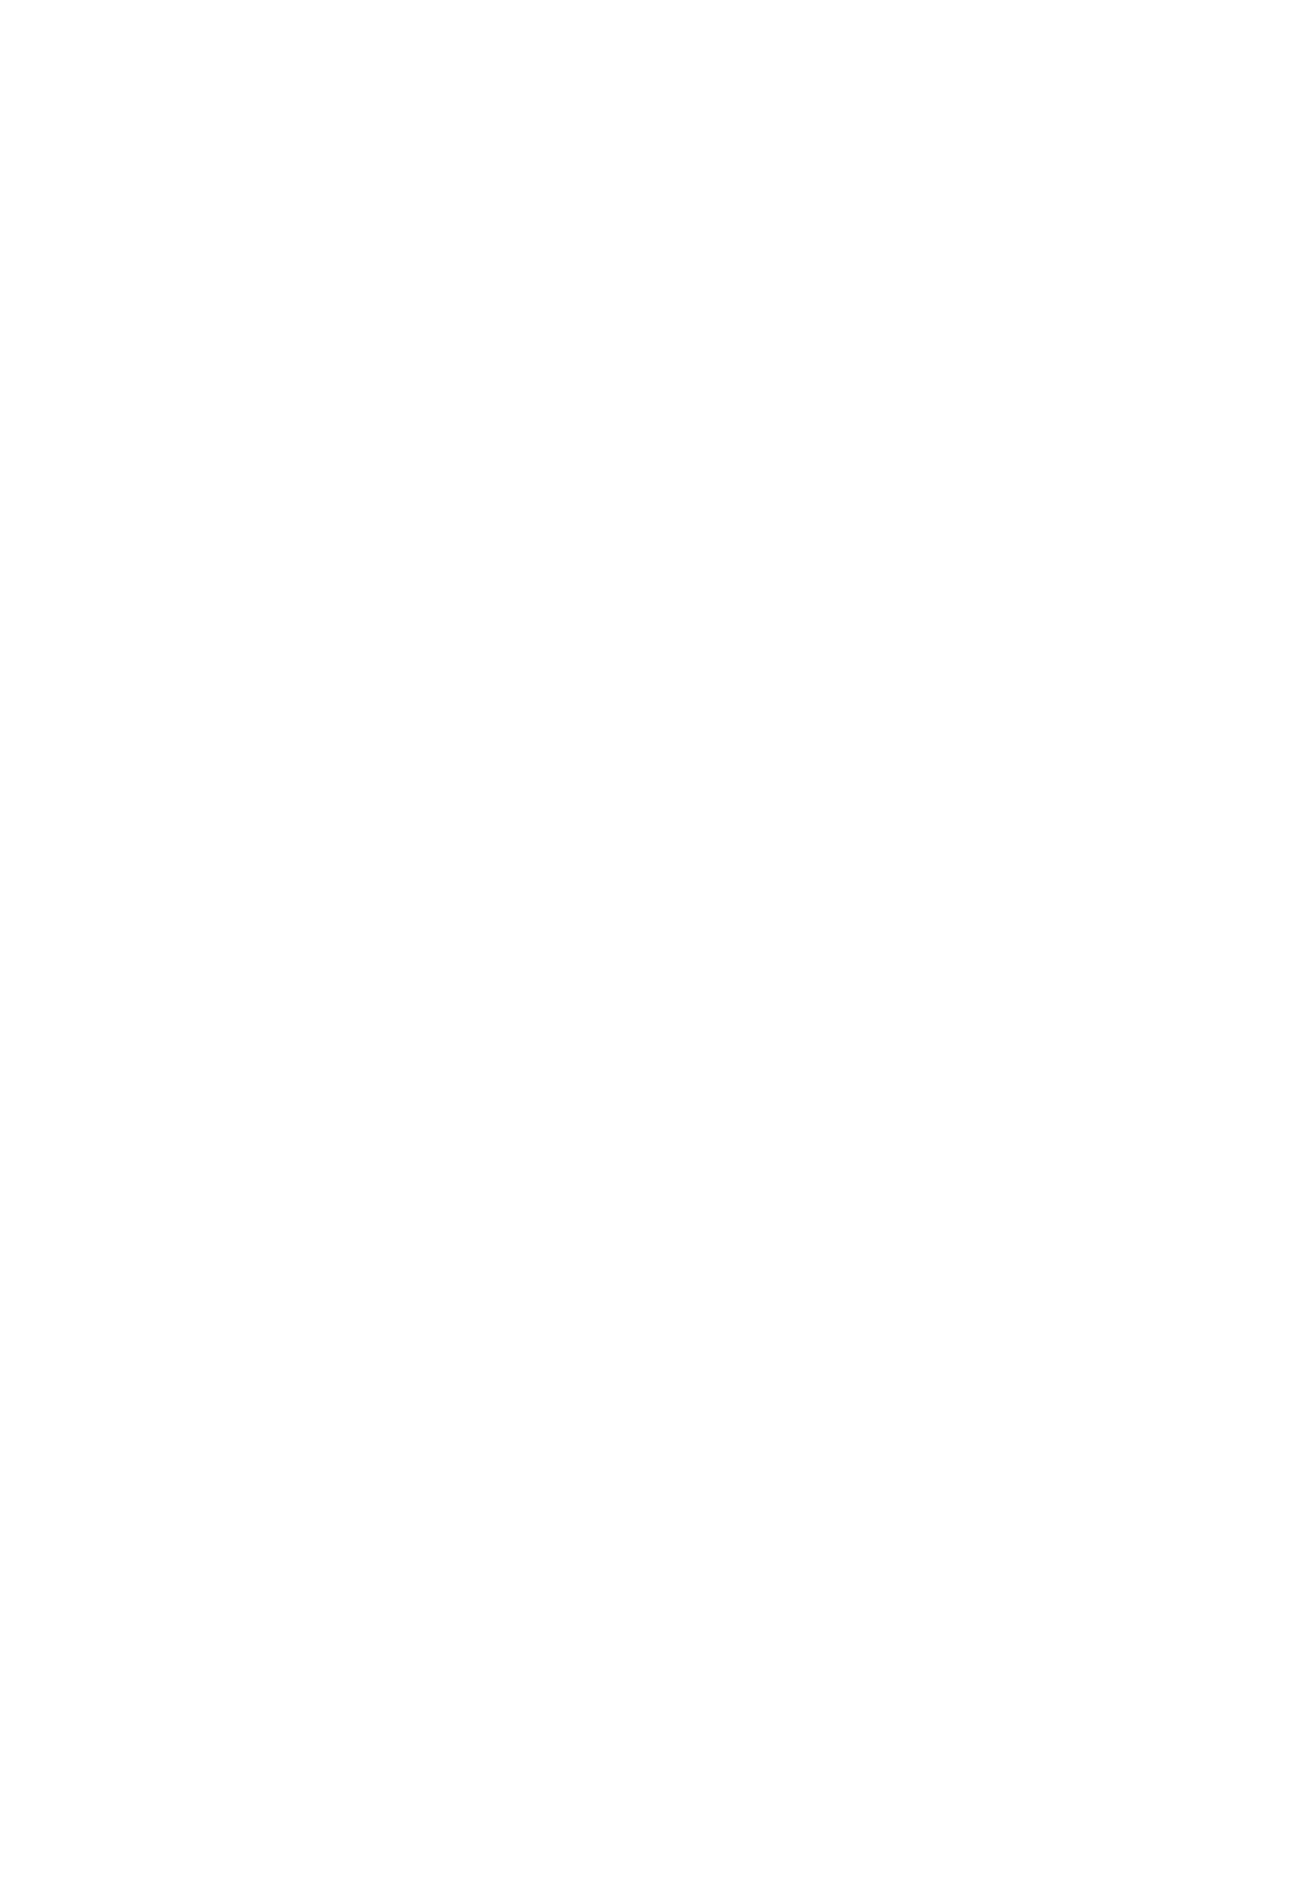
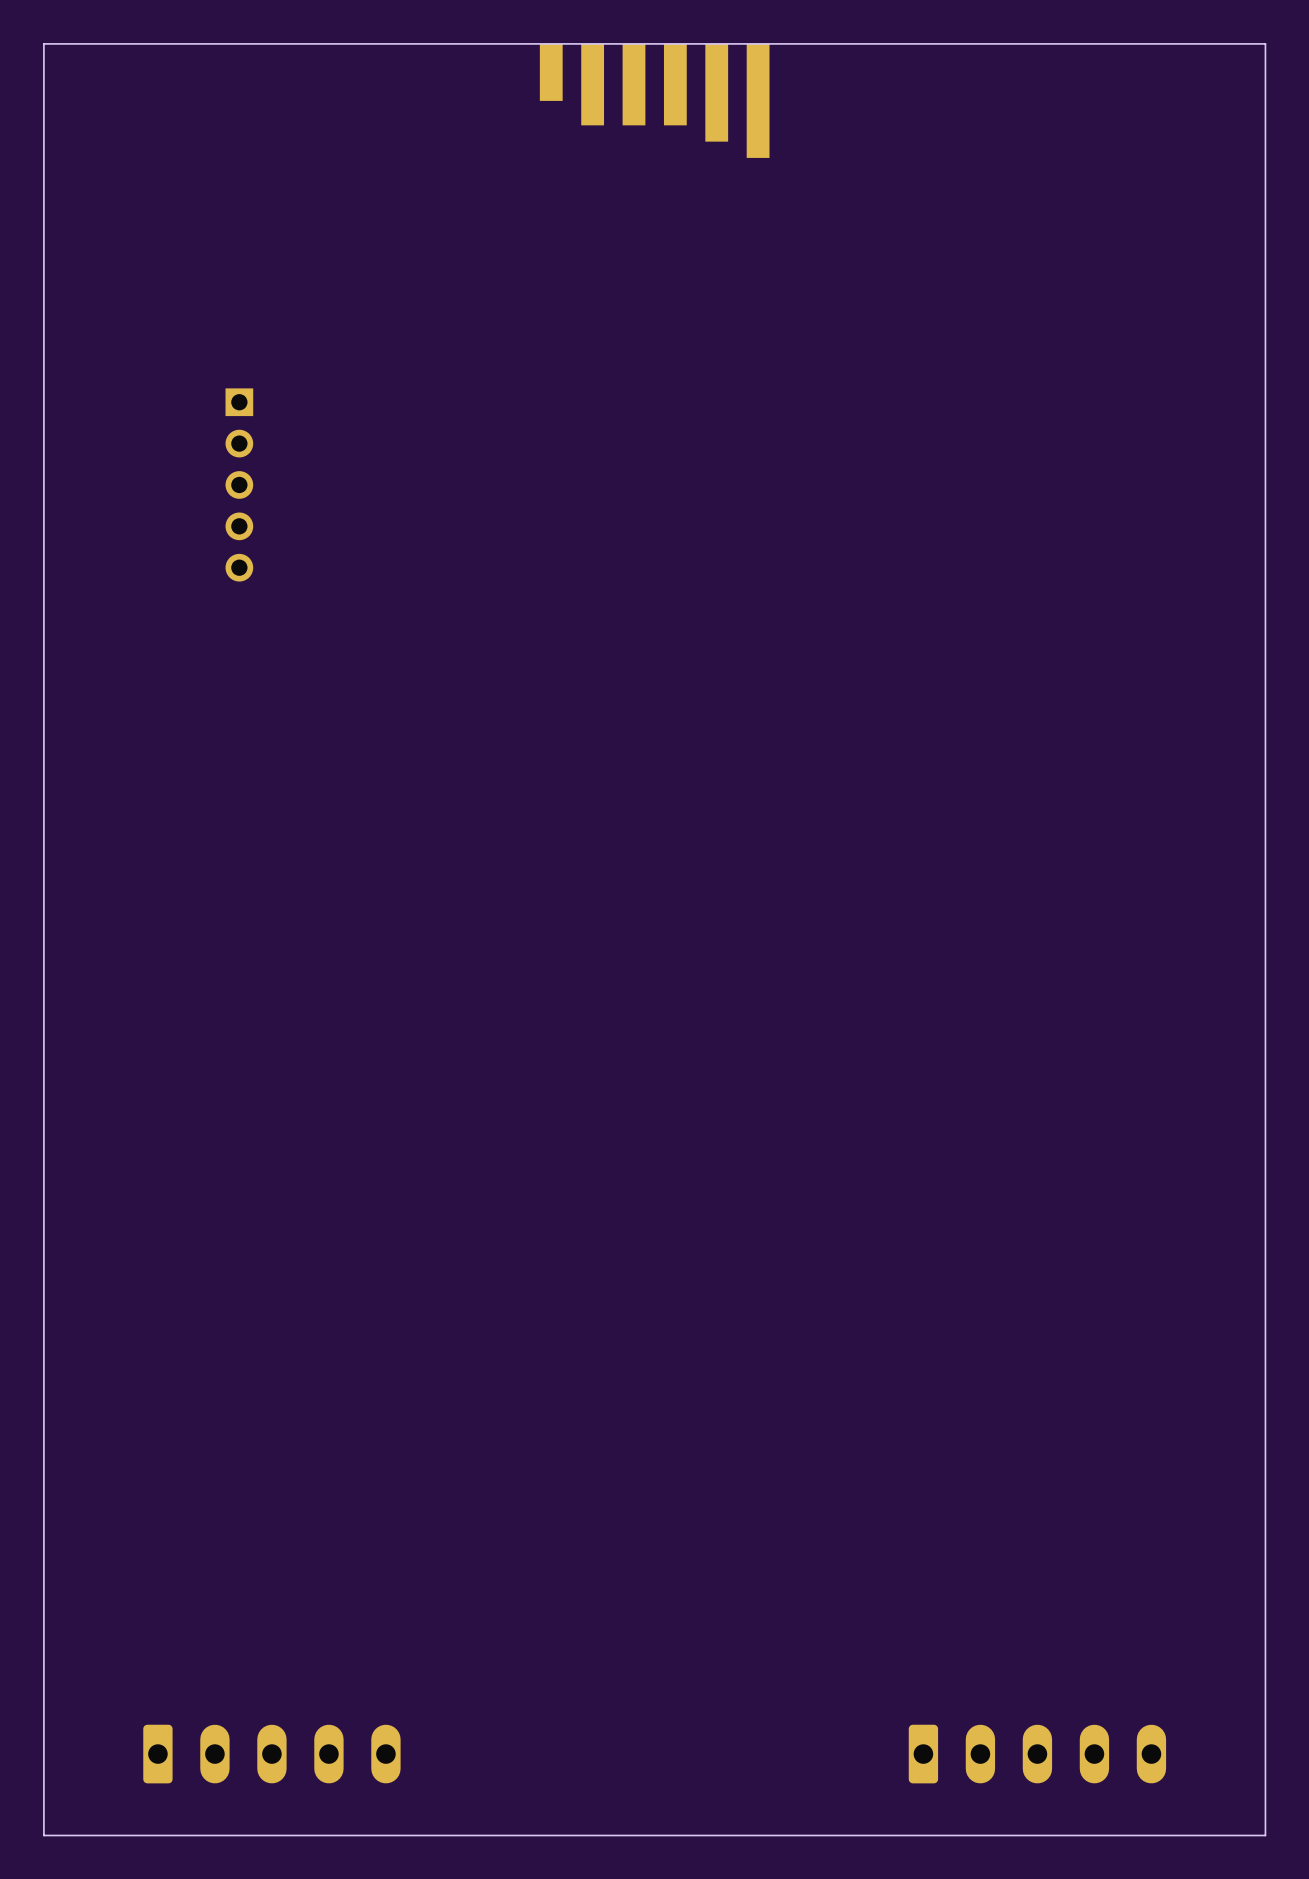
board edge: none -> (1265, 43) (43, 43) (43, 1835) (1265, 1835) (1265, 43)
part: none -> (654, 100)
part: none -> (239, 484)
part: none -> (271, 1754)
part: none -> (1037, 1754)

